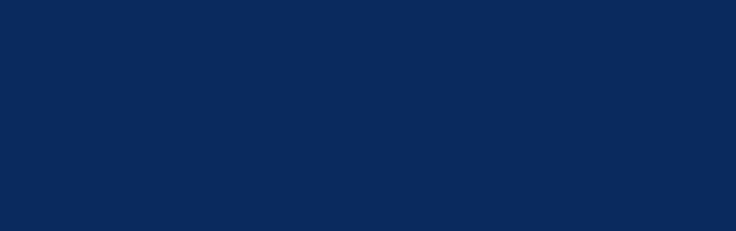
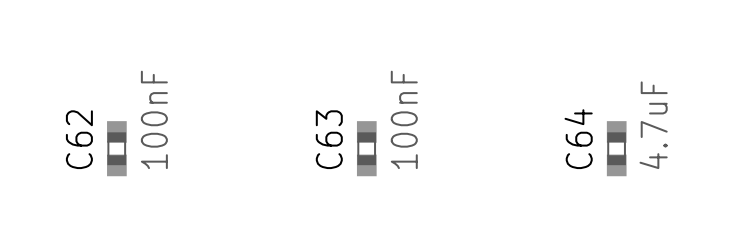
C62: none -> 100nF (116, 148)
C63: none -> 100nF (366, 148)
C64: none -> 4.7uF (616, 148)

